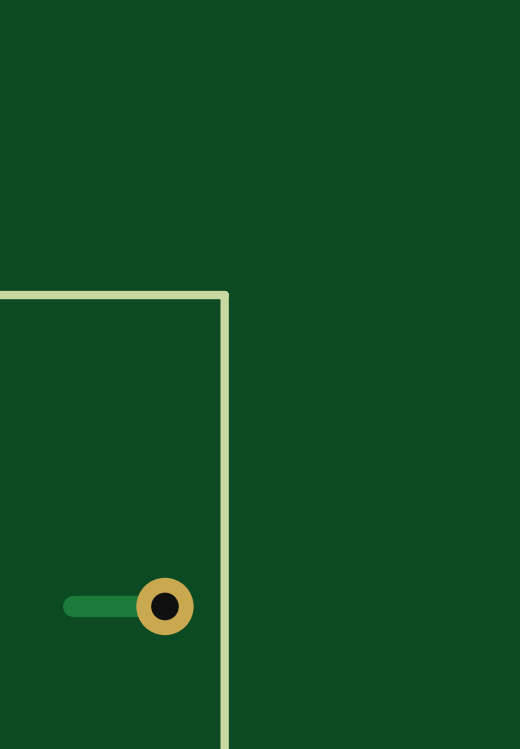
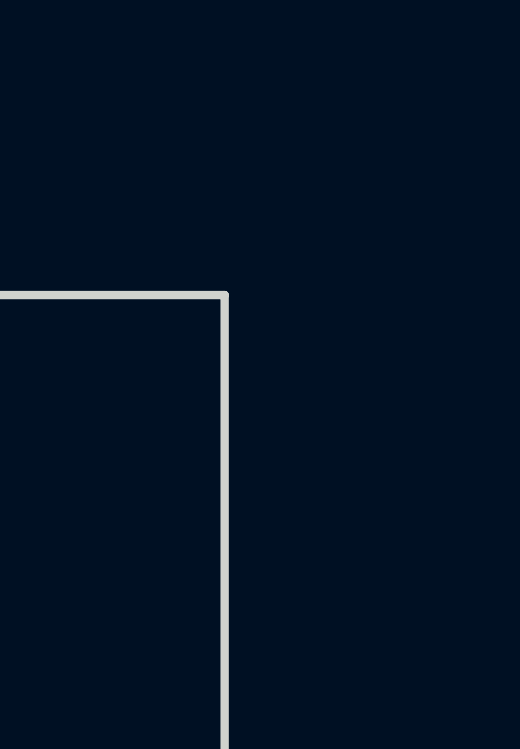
track: (164, 606) (73, 606) -> none
via: (164, 606) -> none

